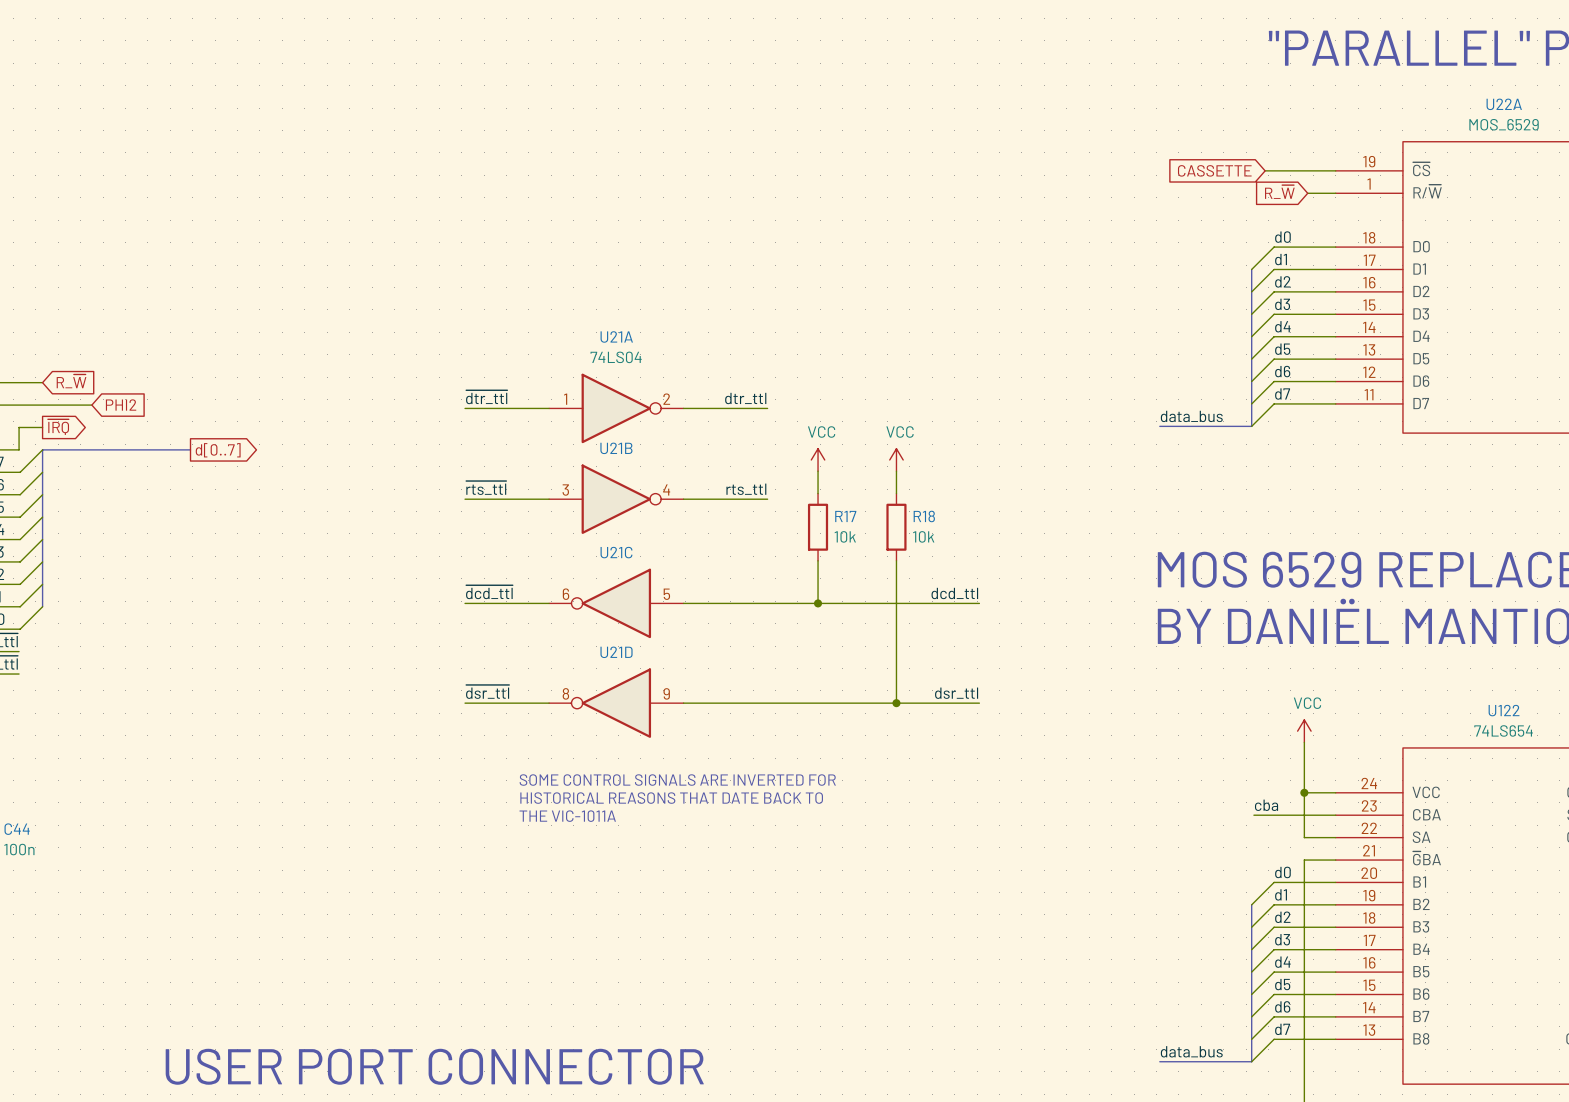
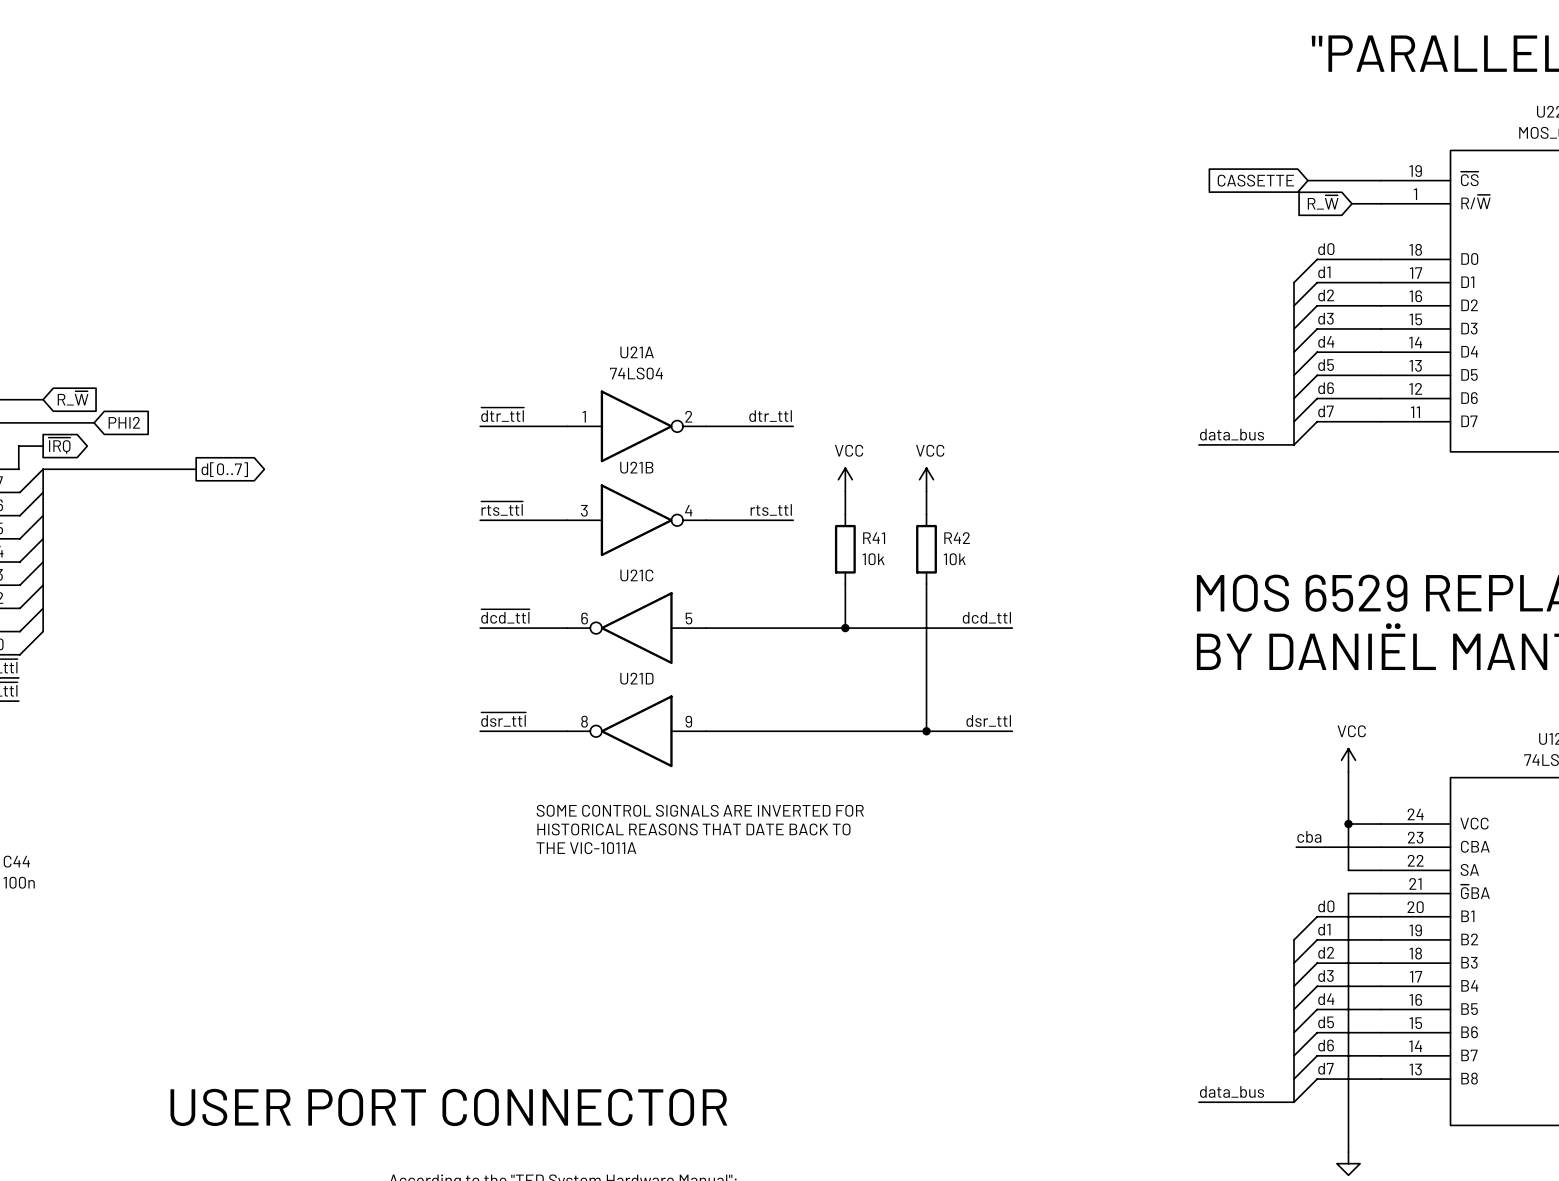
R17 name: R17 (845, 516) -> R41 (874, 538)
R18 name: R18 (924, 516) -> R42 (957, 538)

